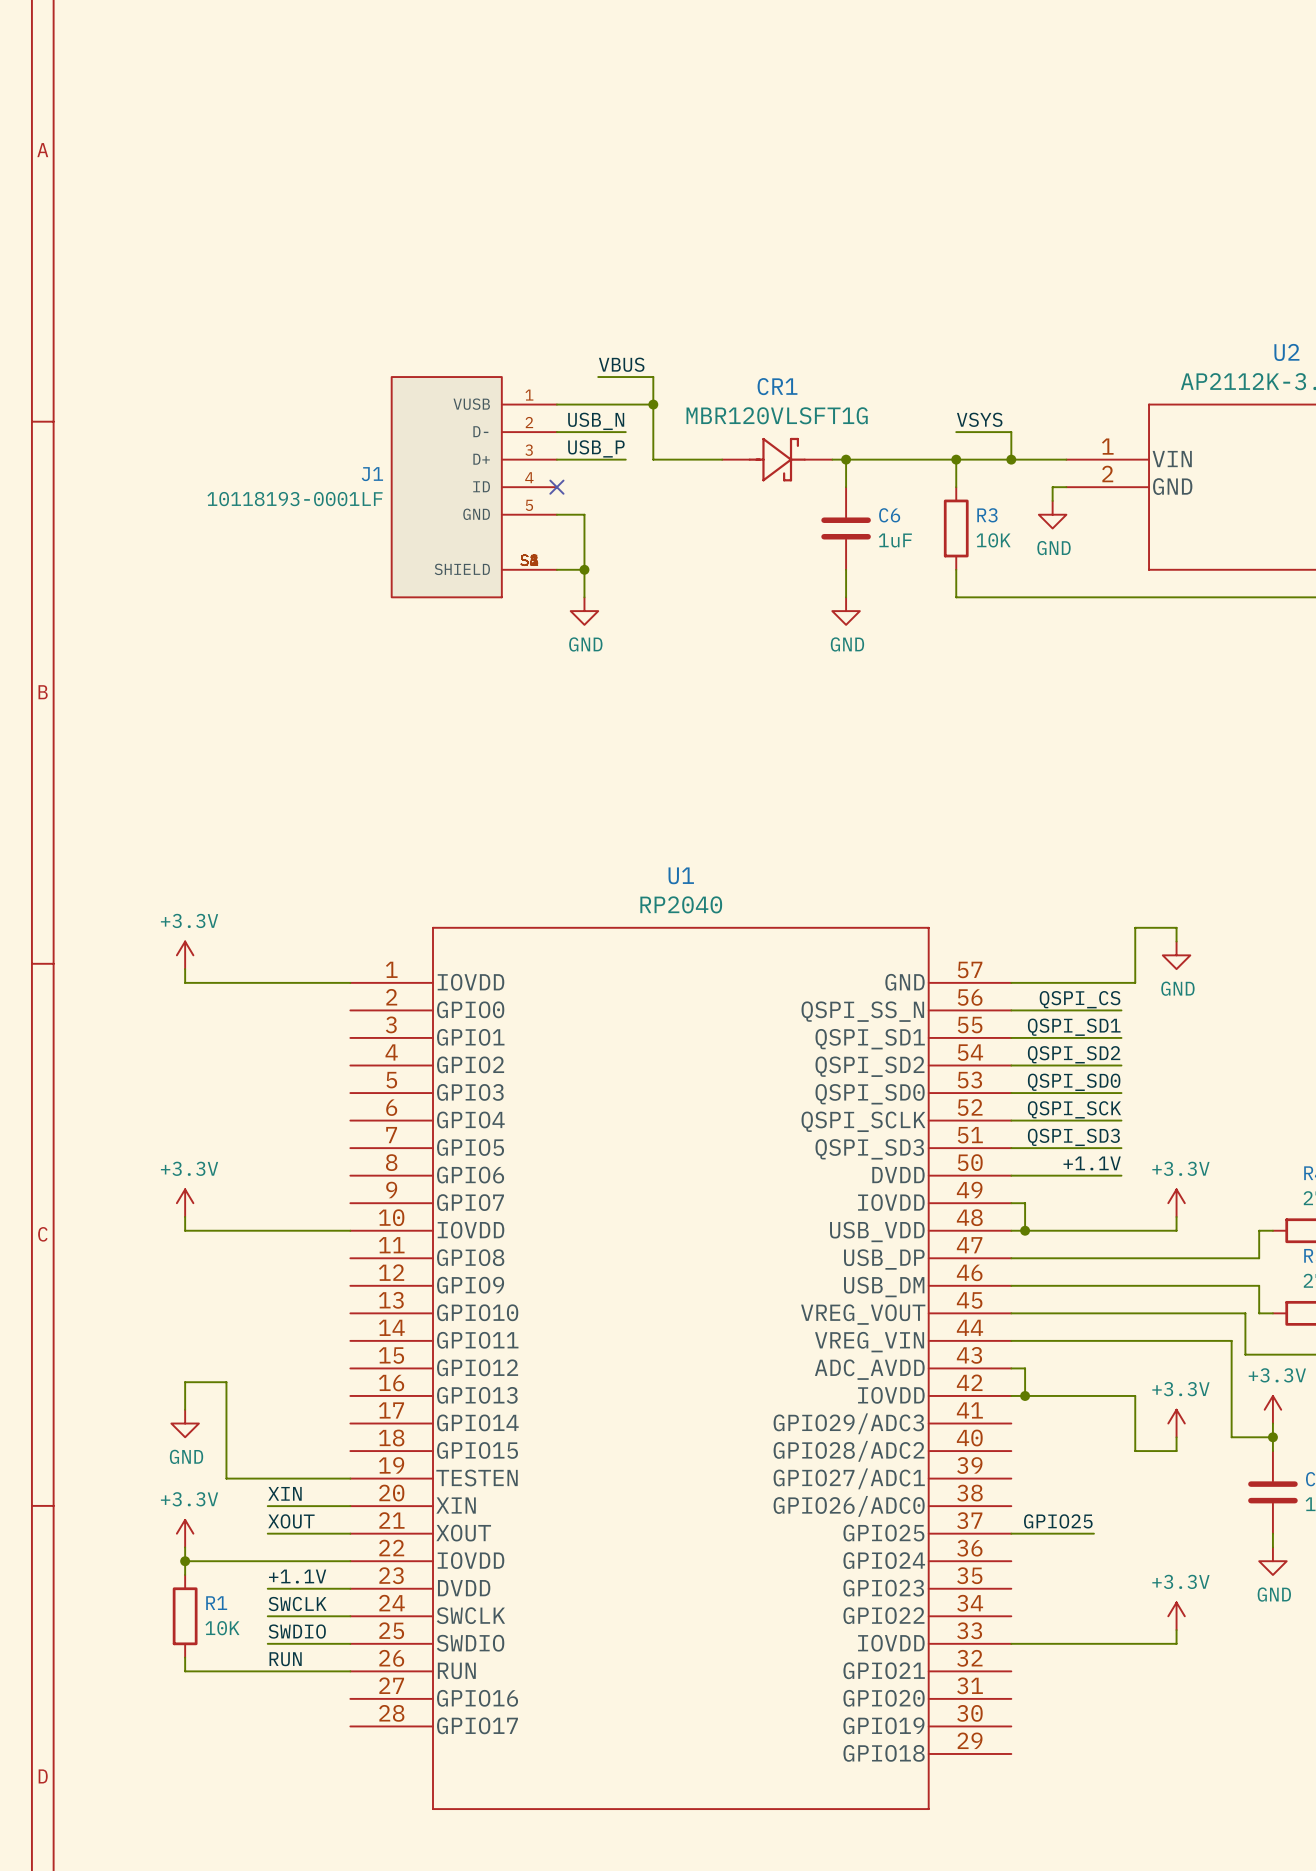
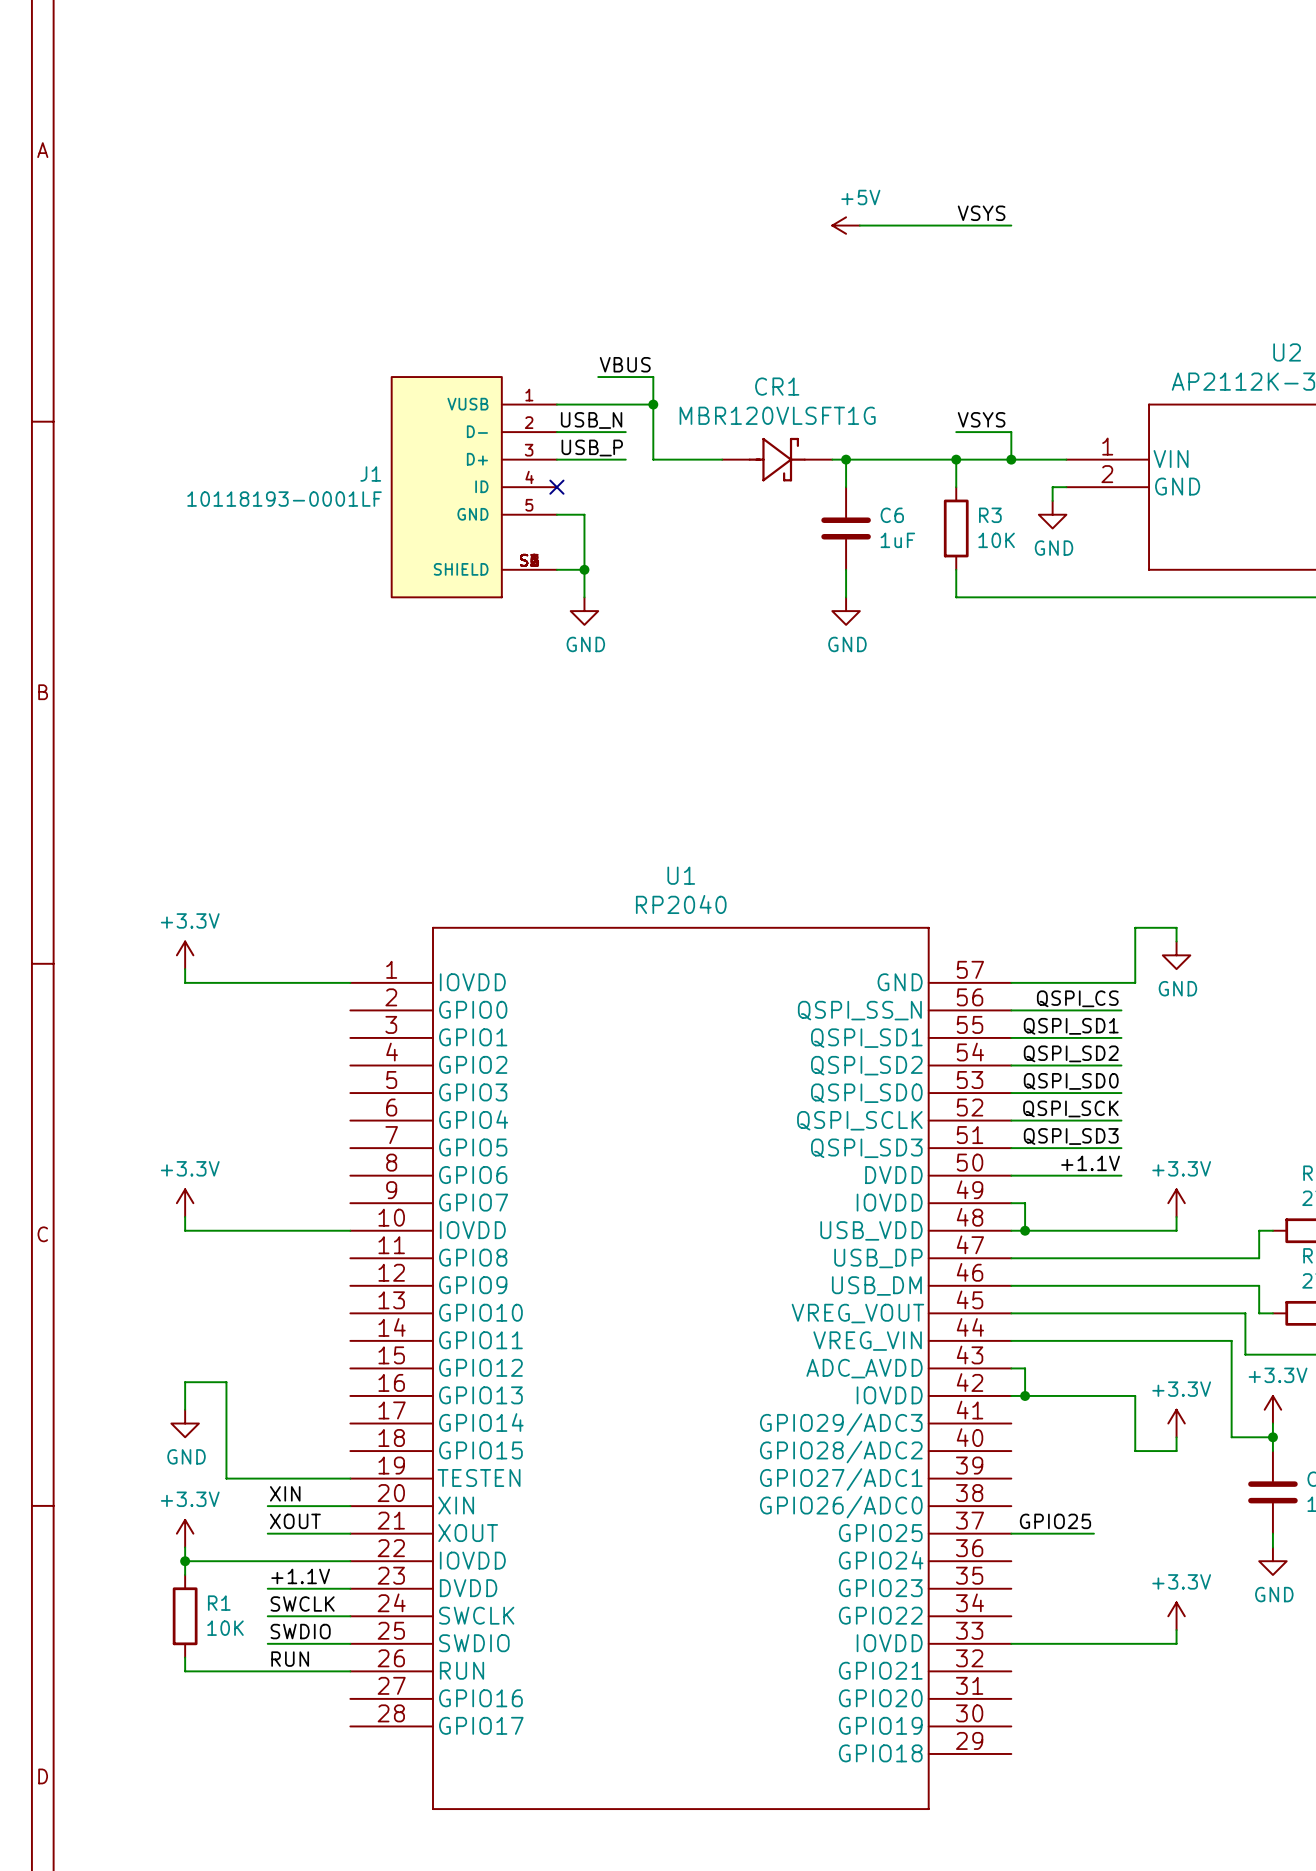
label: none -> VSYS (981, 213)
power symbol: none -> +5V (846, 225)
wire: none -> (859, 225) (1011, 225)

